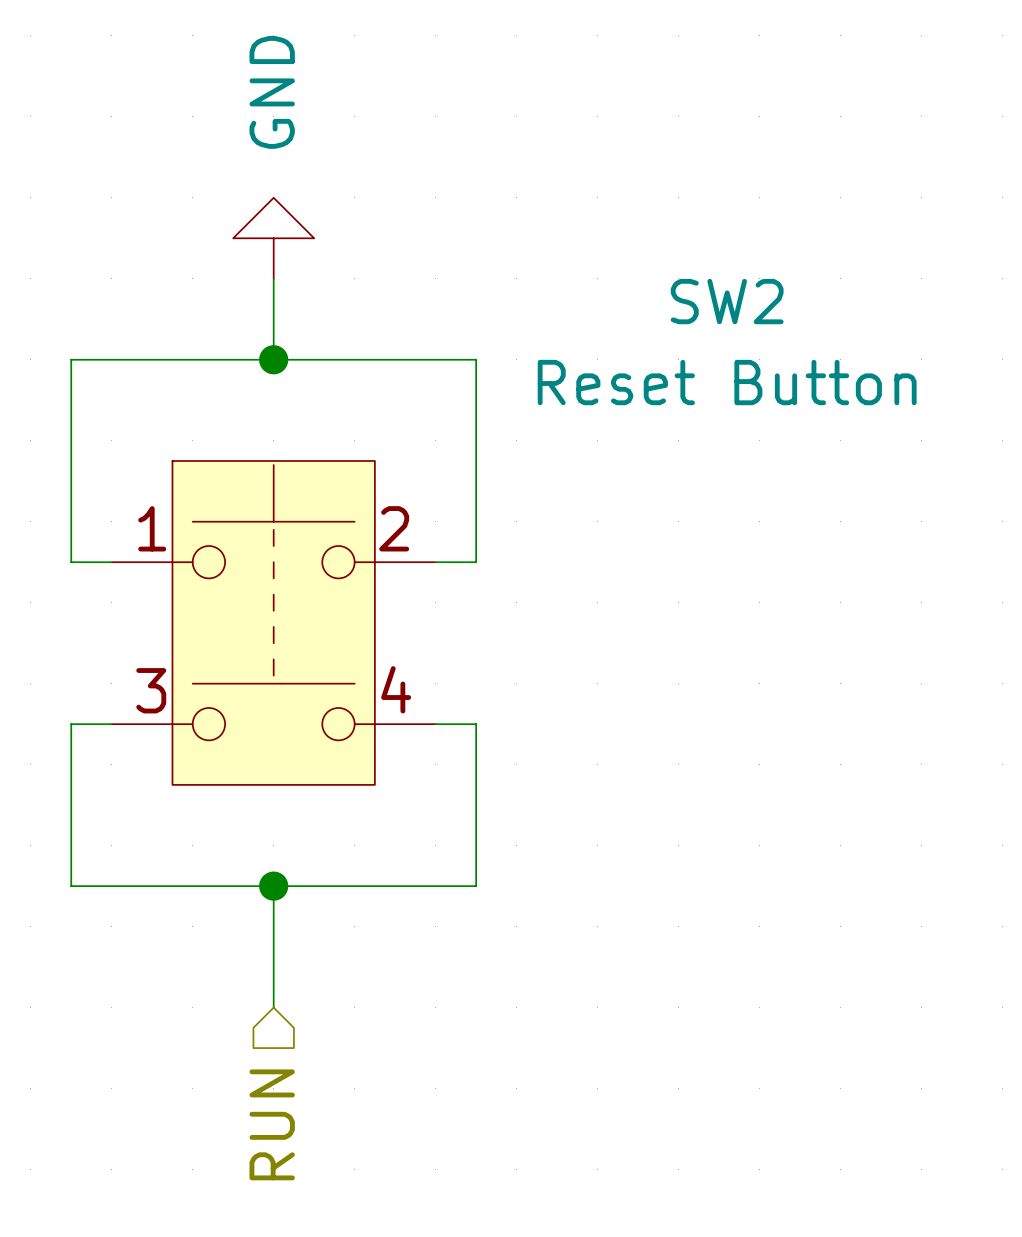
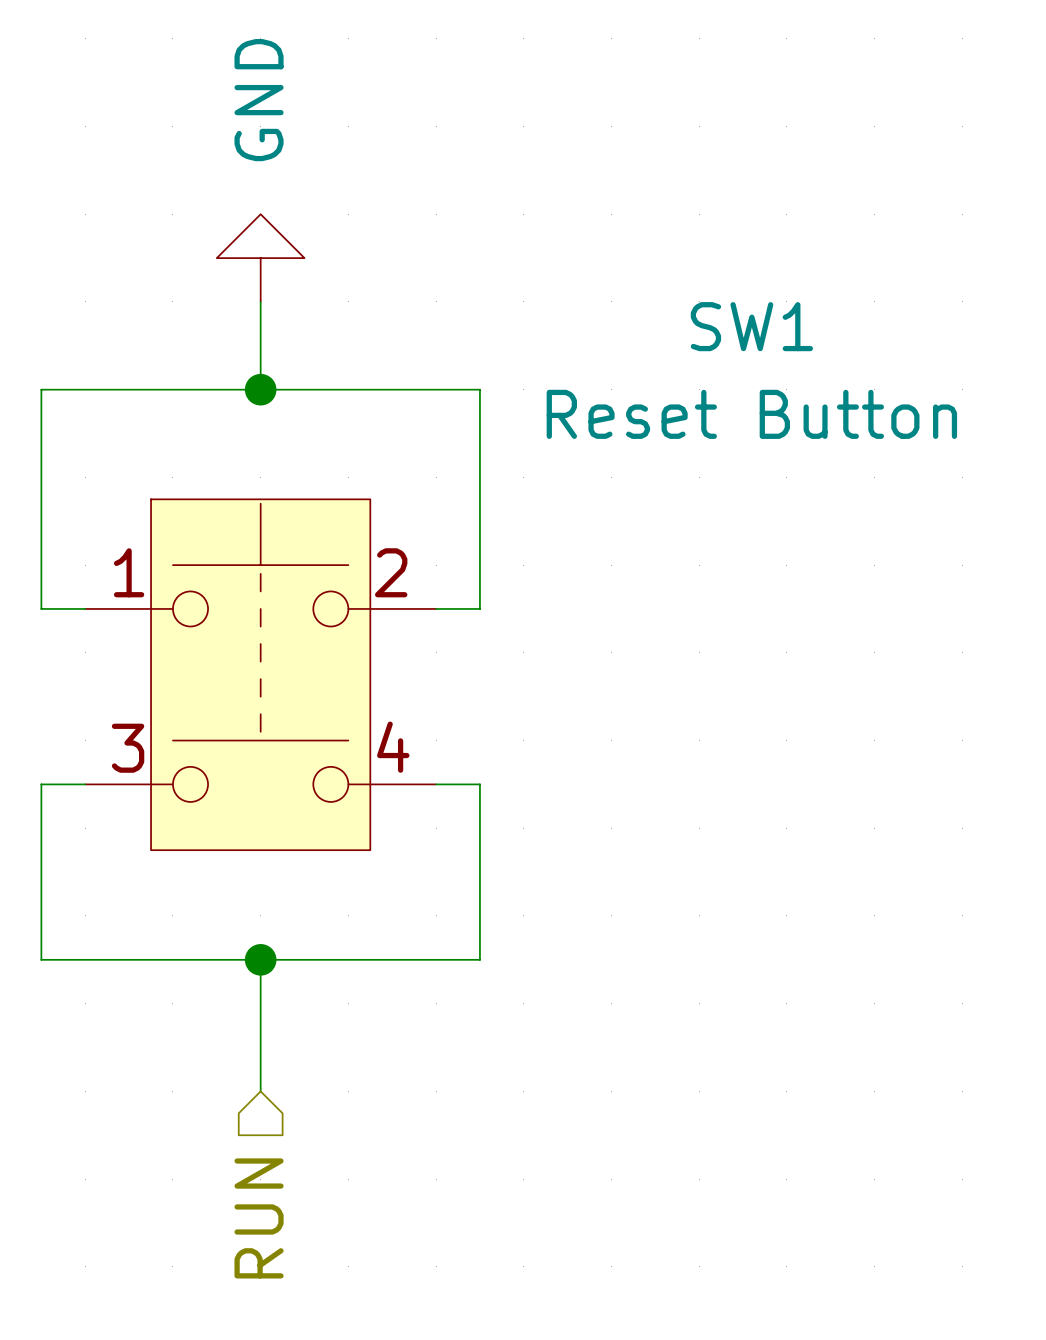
SW2 name: SW2 (727, 301) -> SW1 (751, 326)

